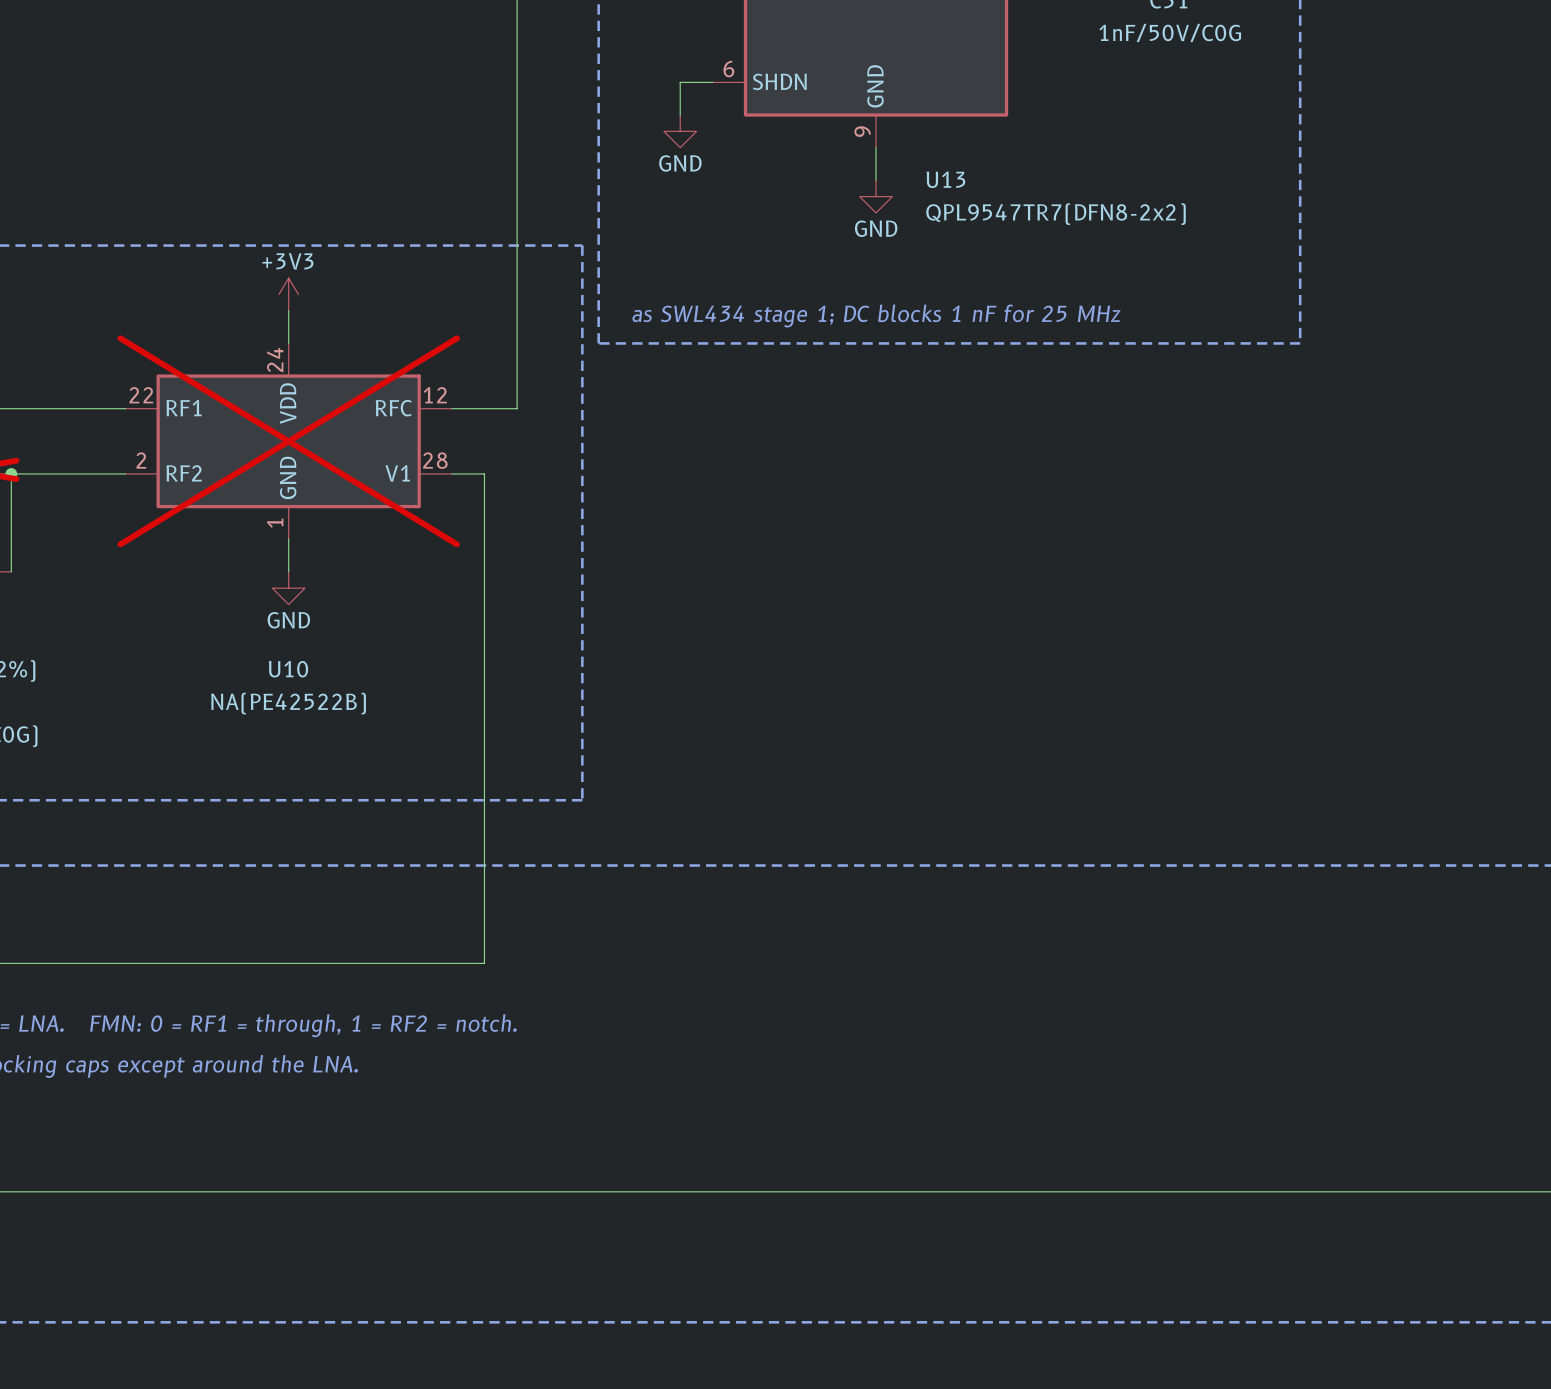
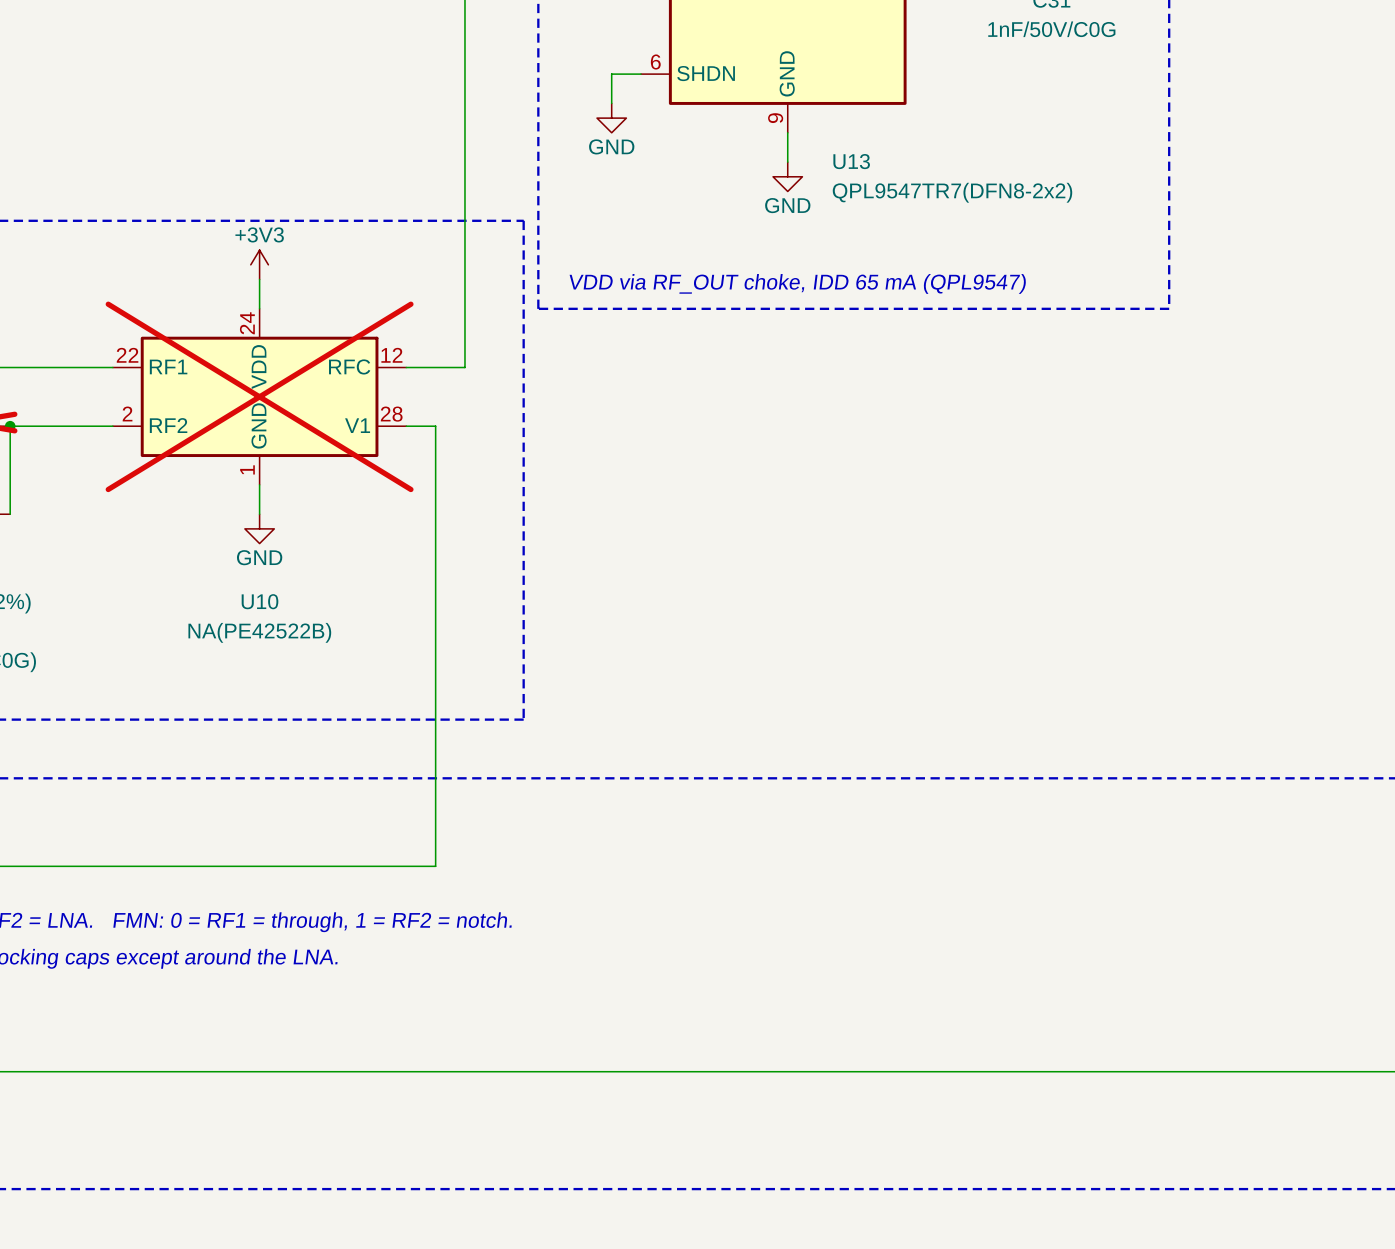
text: as SWL434 stage 1; DC blocks 1 nF for 25 MHz (876, 316) -> VDD via RF_OUT choke, IDD 65 mA (QPL9547) (797, 283)

